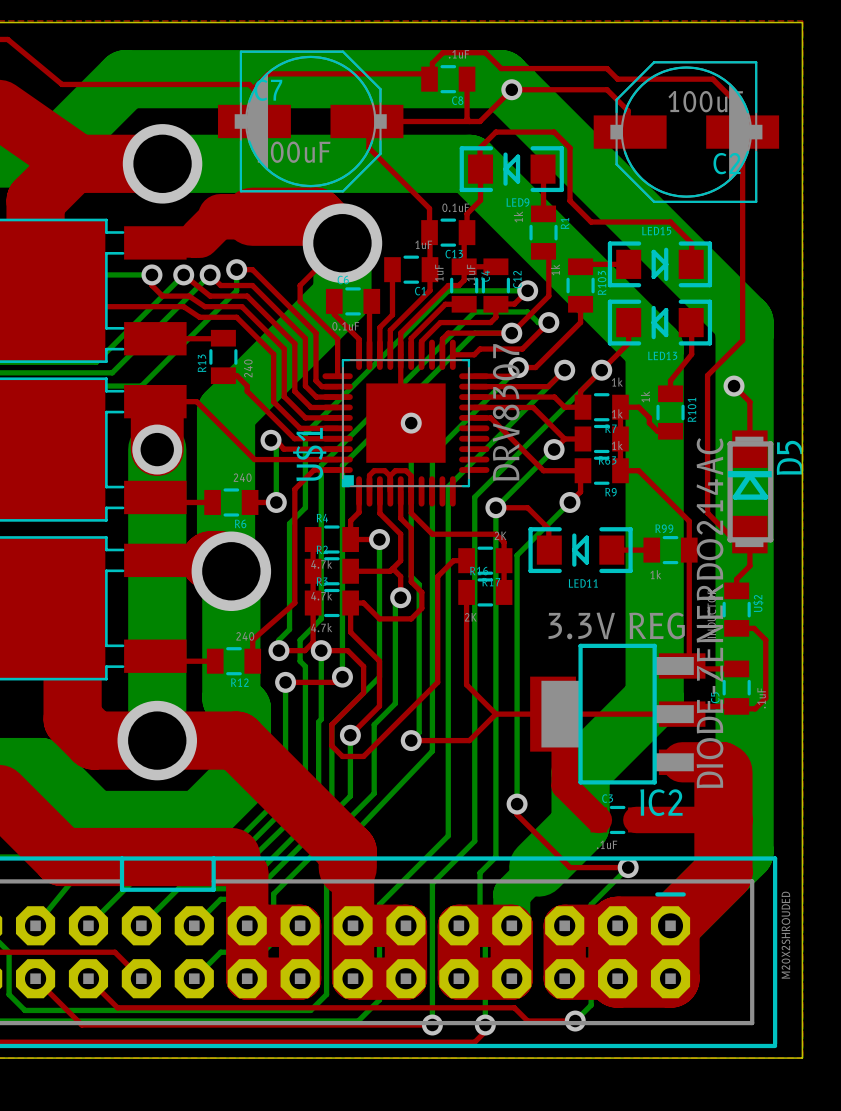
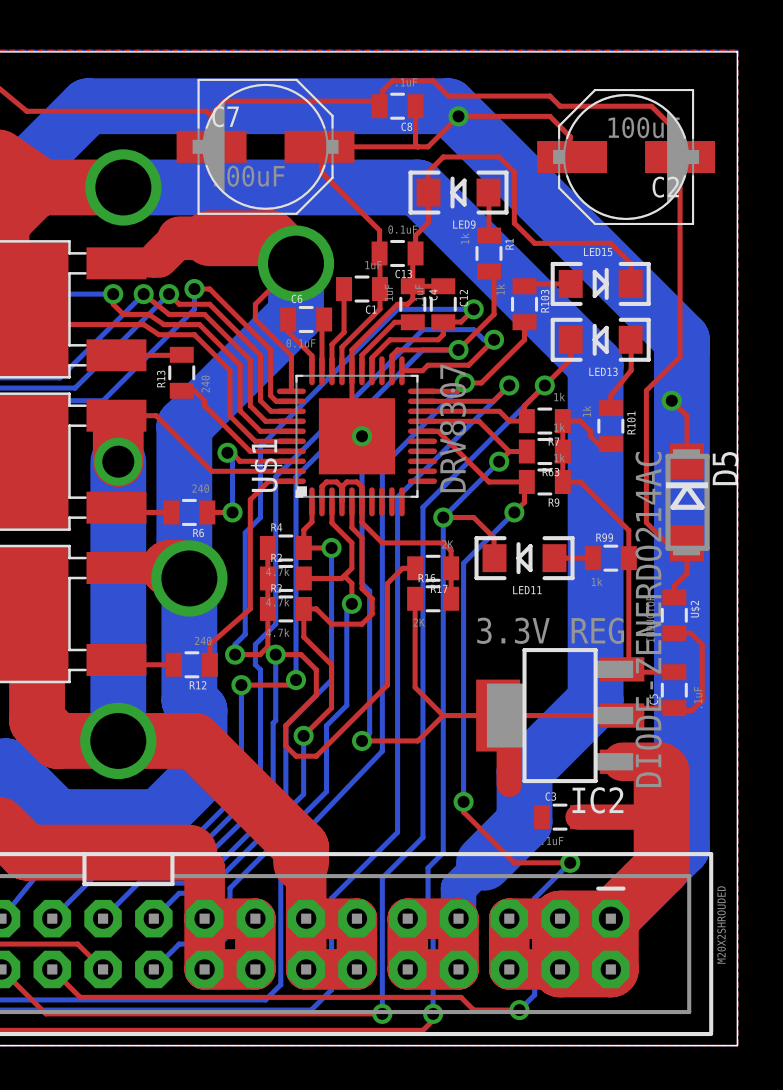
top track: (564, 785) (598, 819) -> none

